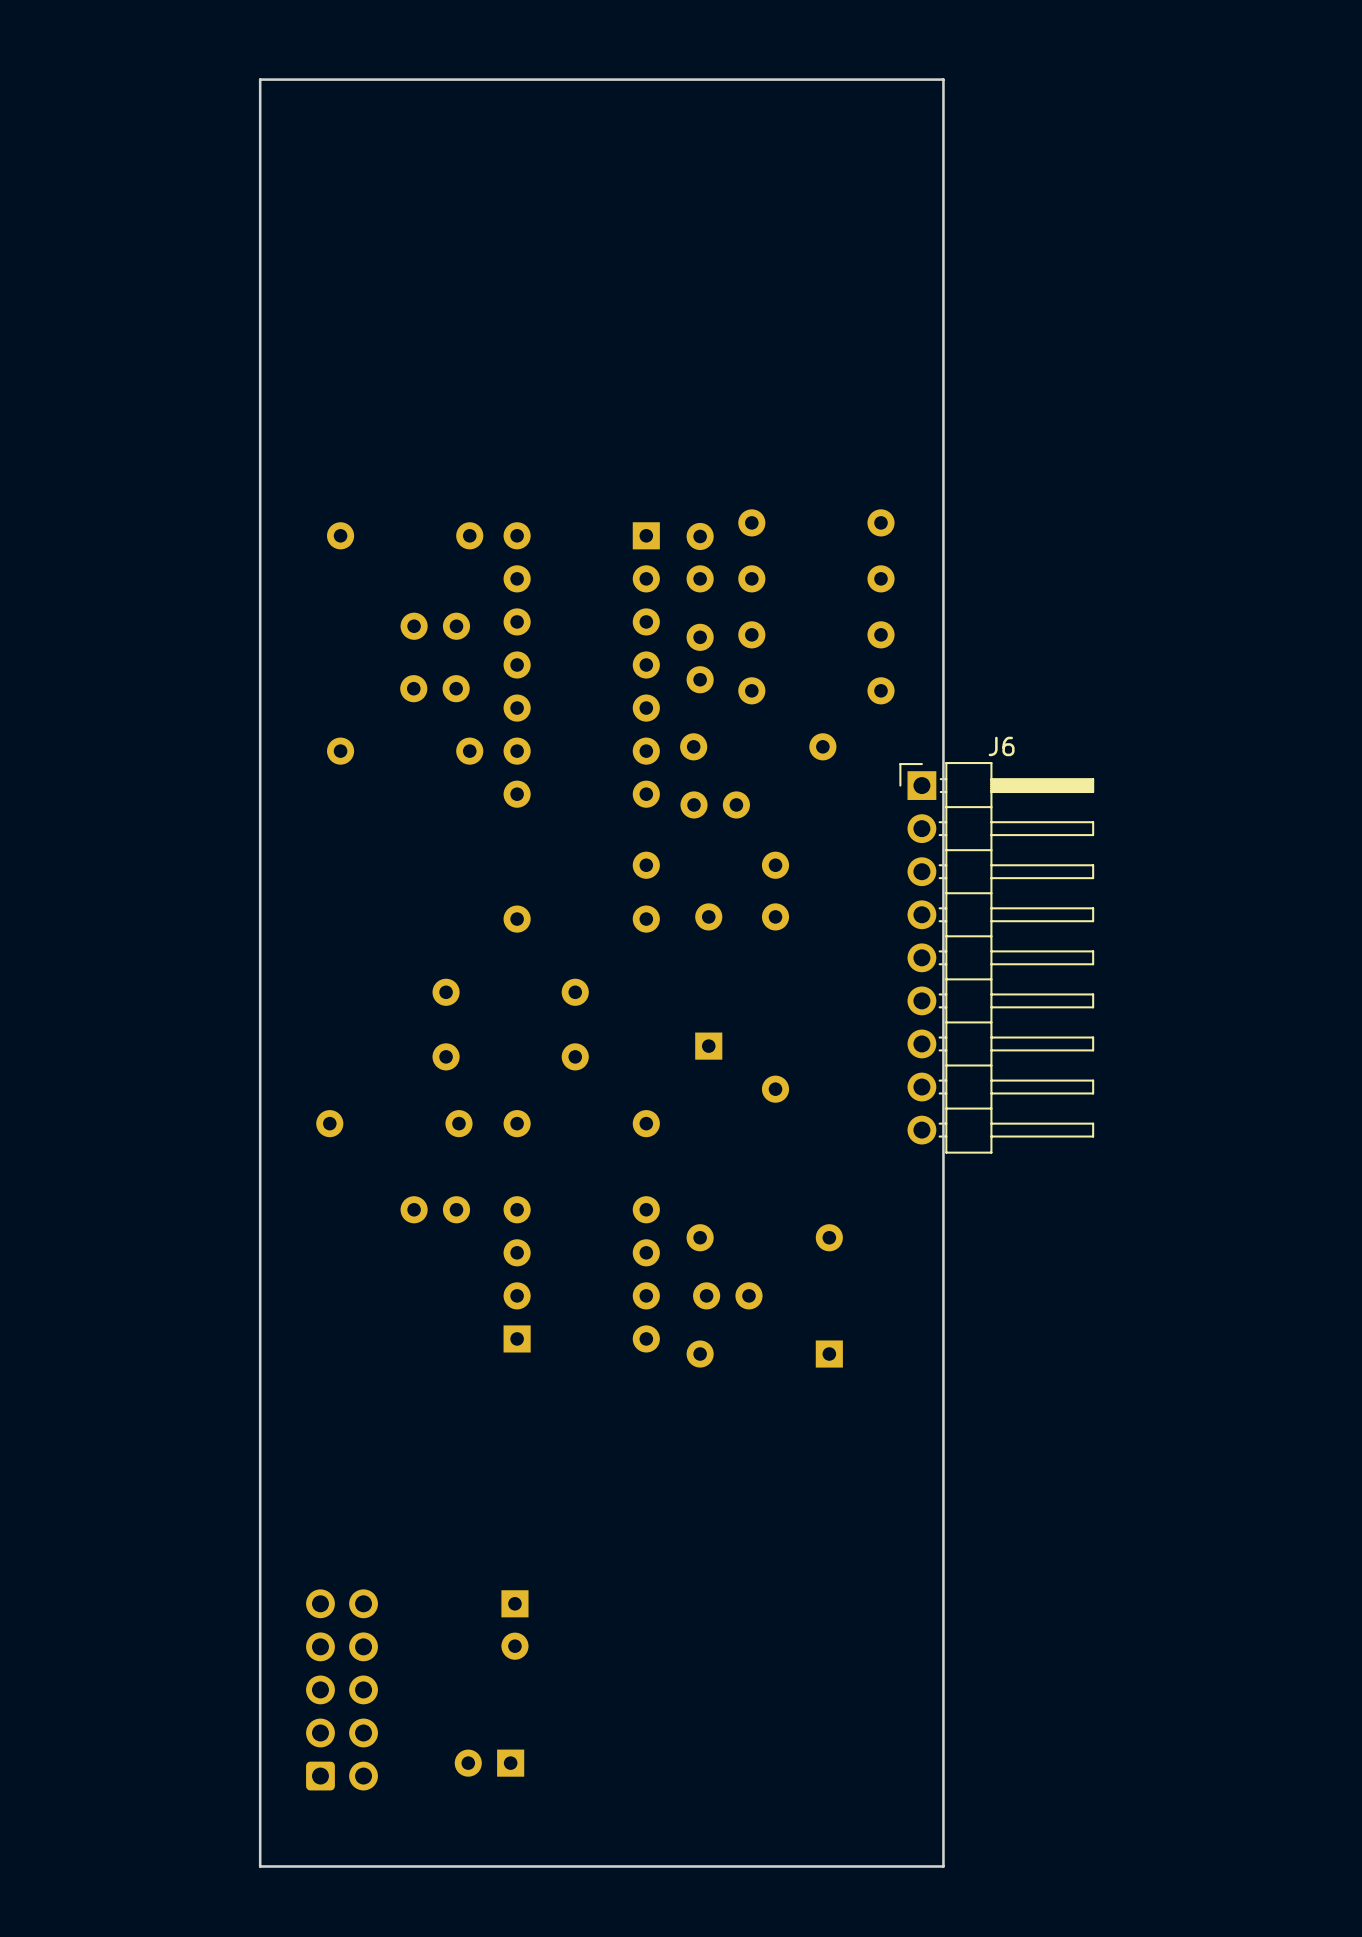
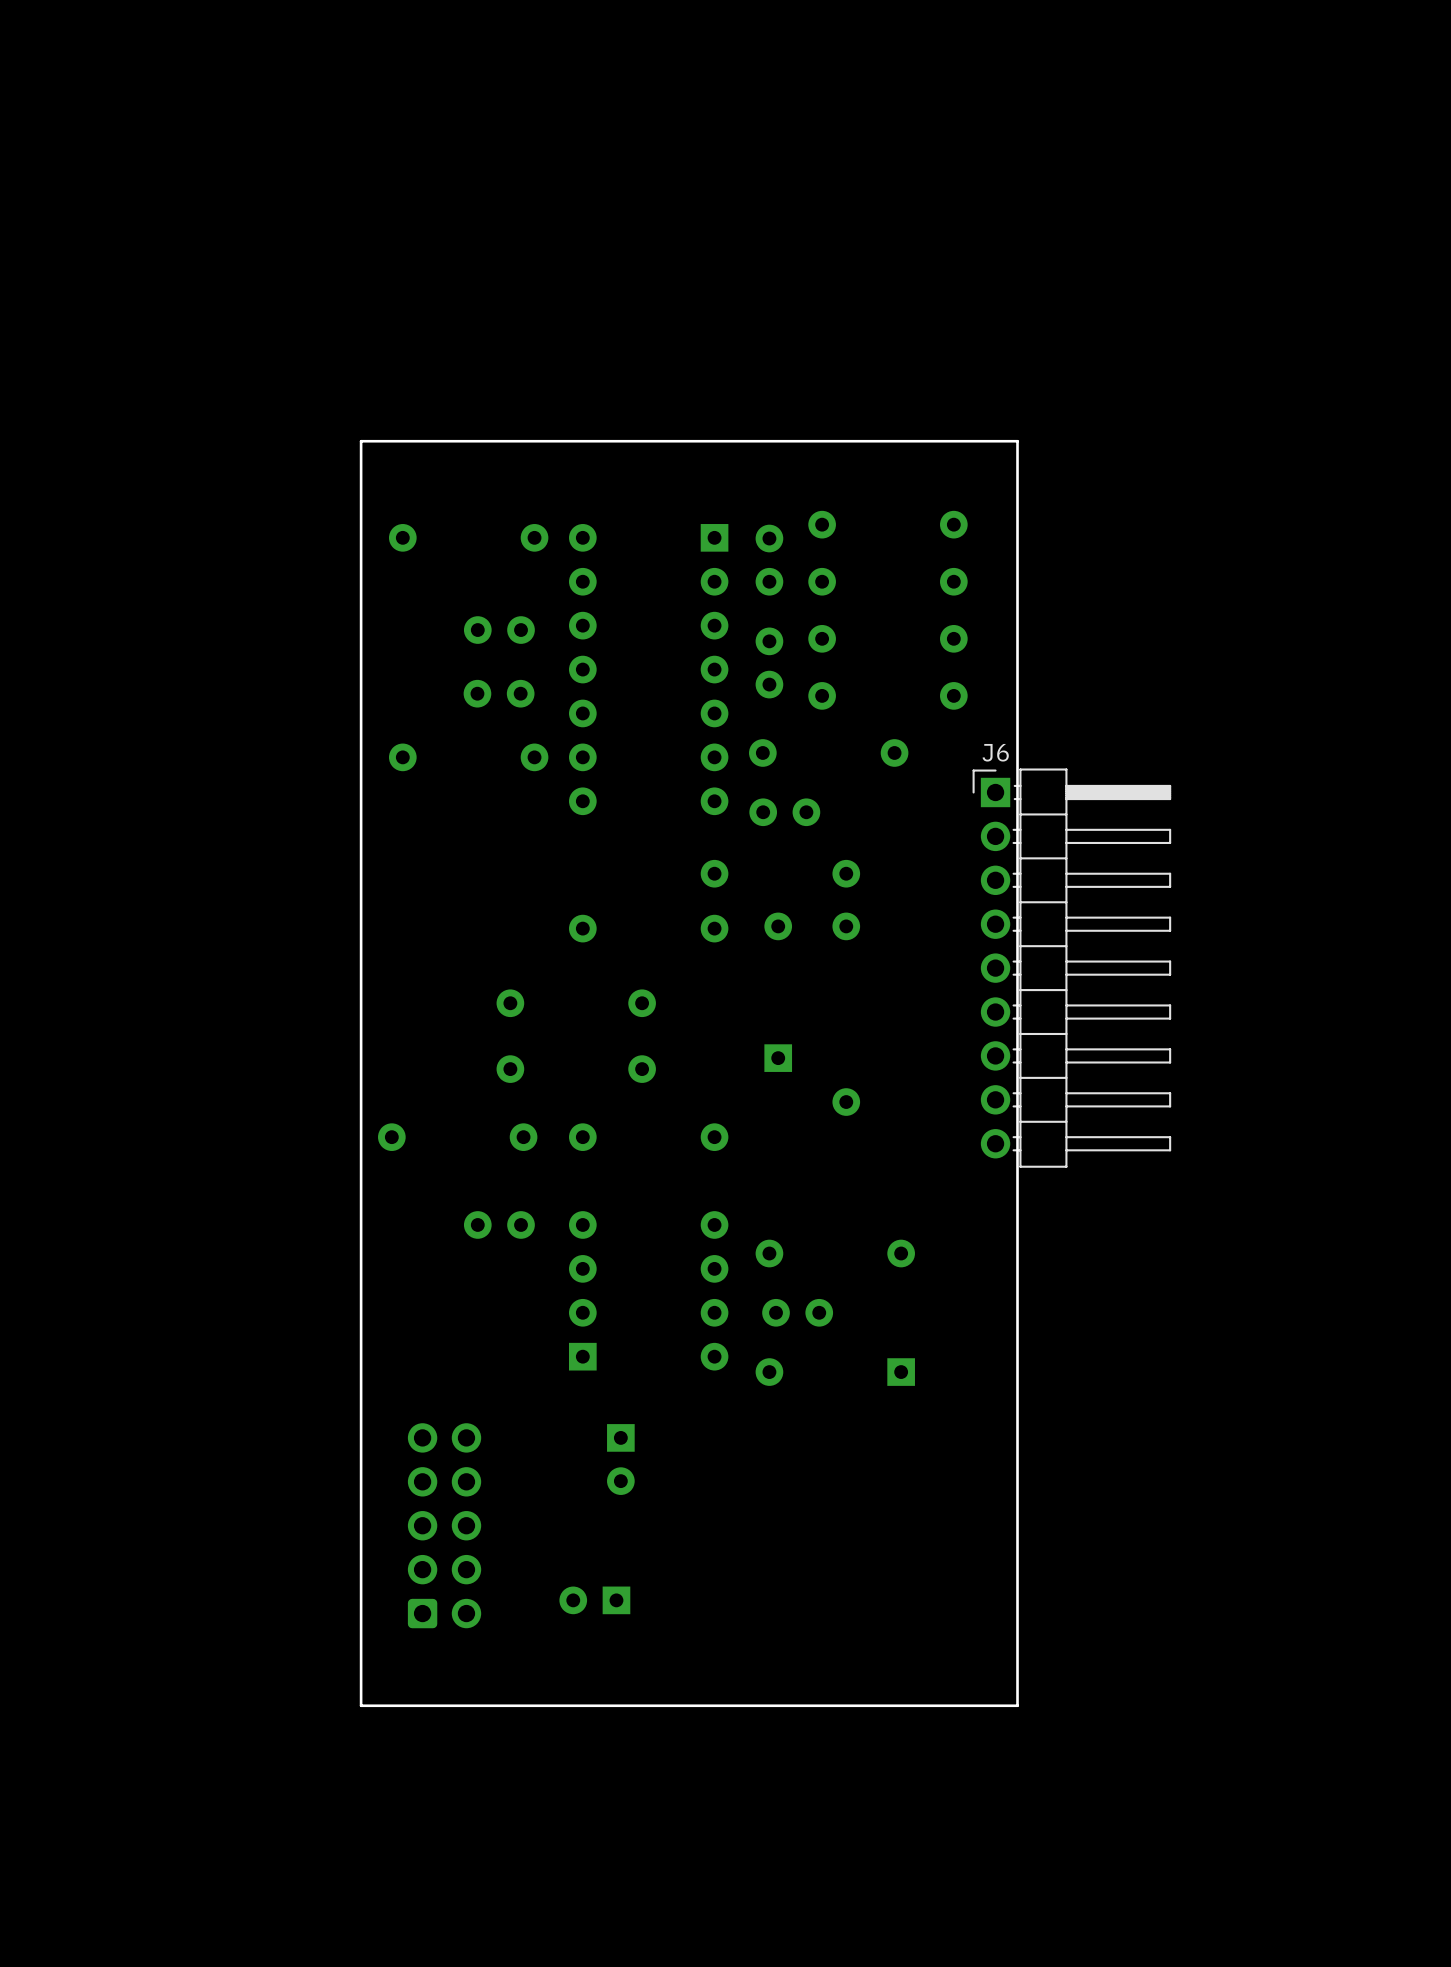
board edge: (943, 441) (943, 79) (260, 79) (260, 1866) (943, 1866) (943, 1681) -> (1017, 441) (361, 441) (361, 1705) (1017, 1705)
J6 name position: J6 (1001, 746) -> J6 (995, 752)
part: none -> (620, 1459)
part rotation: 0° (514, 1624) -> 90° clockwise (594, 1600)
part position: (514, 1624) -> (594, 1600)
part position: (342, 1689) -> (444, 1525)
part: (489, 1763) -> none

